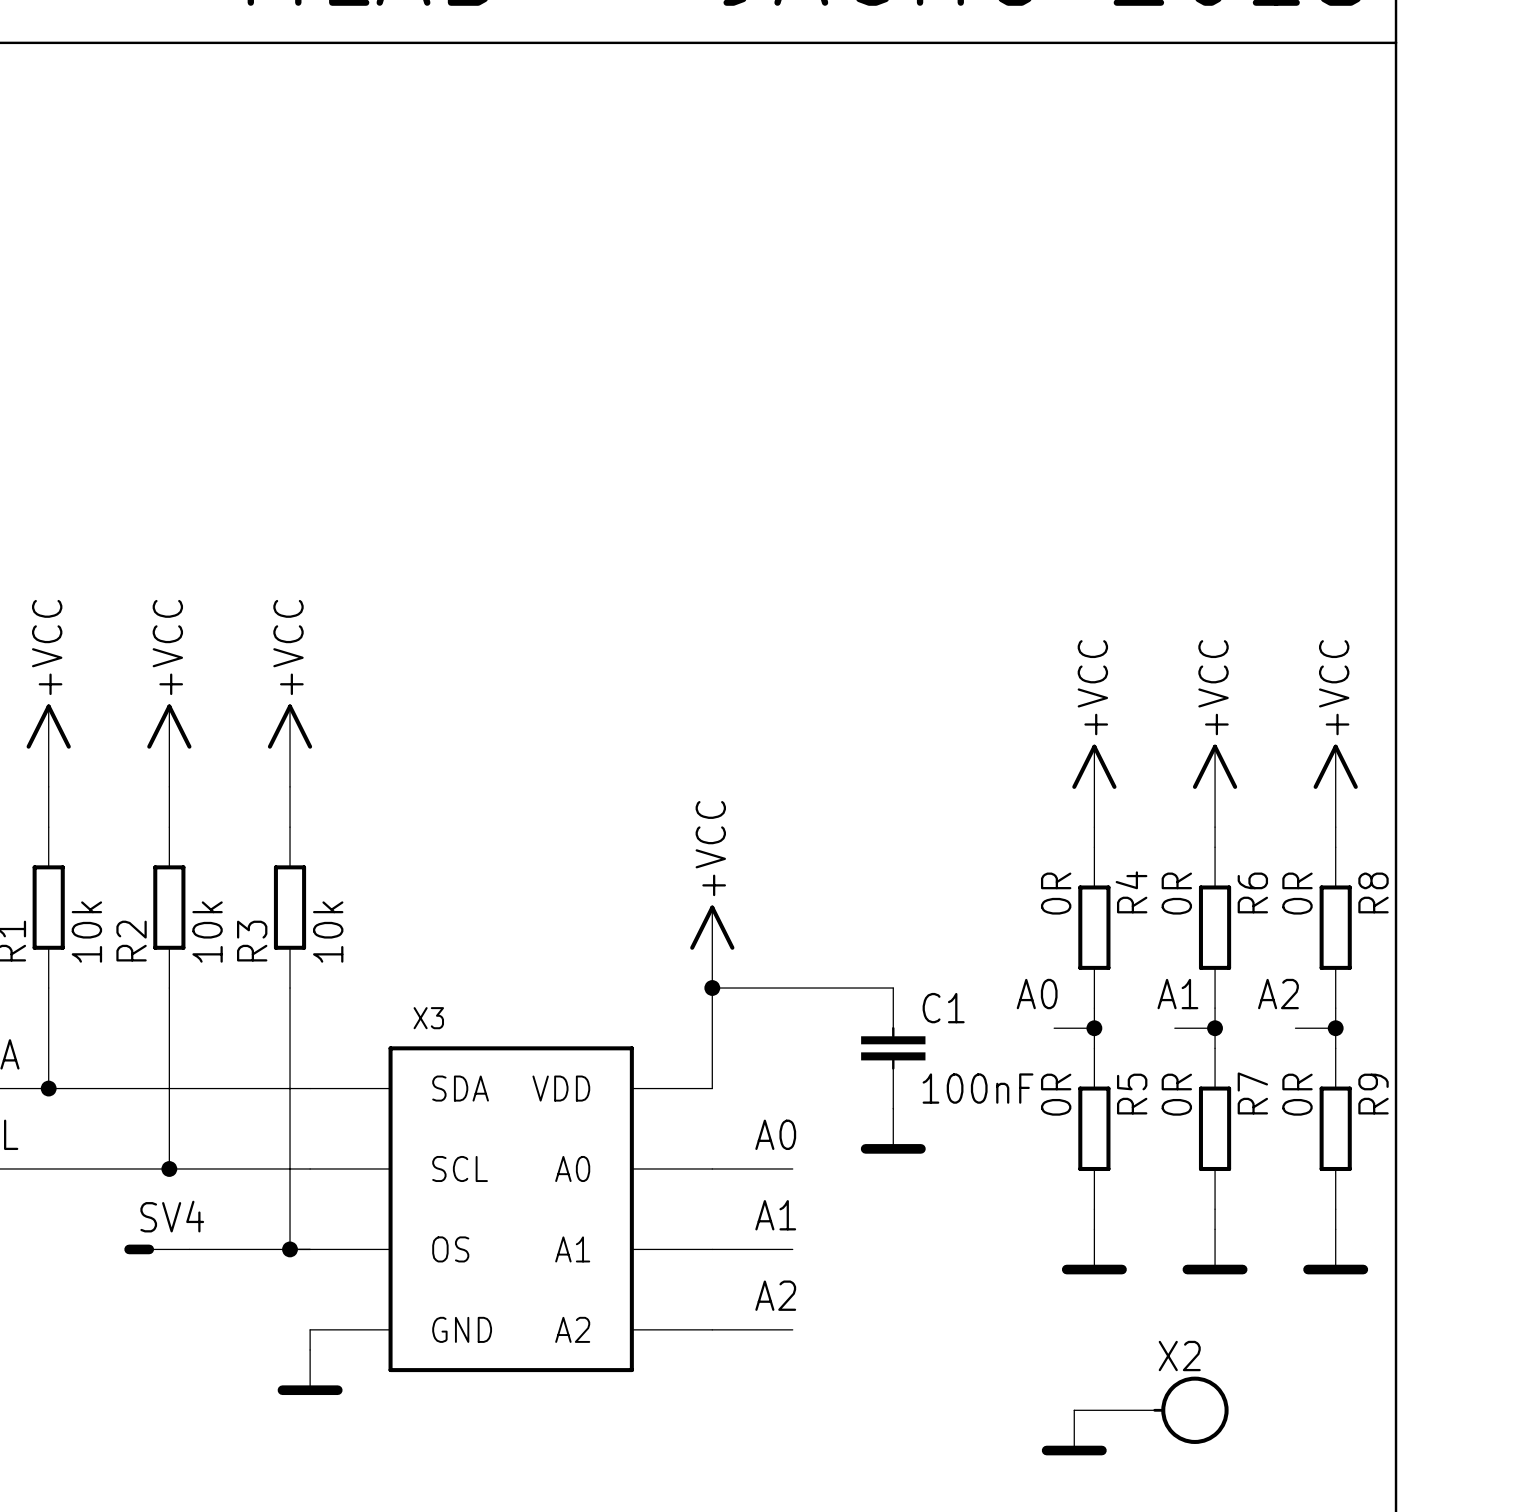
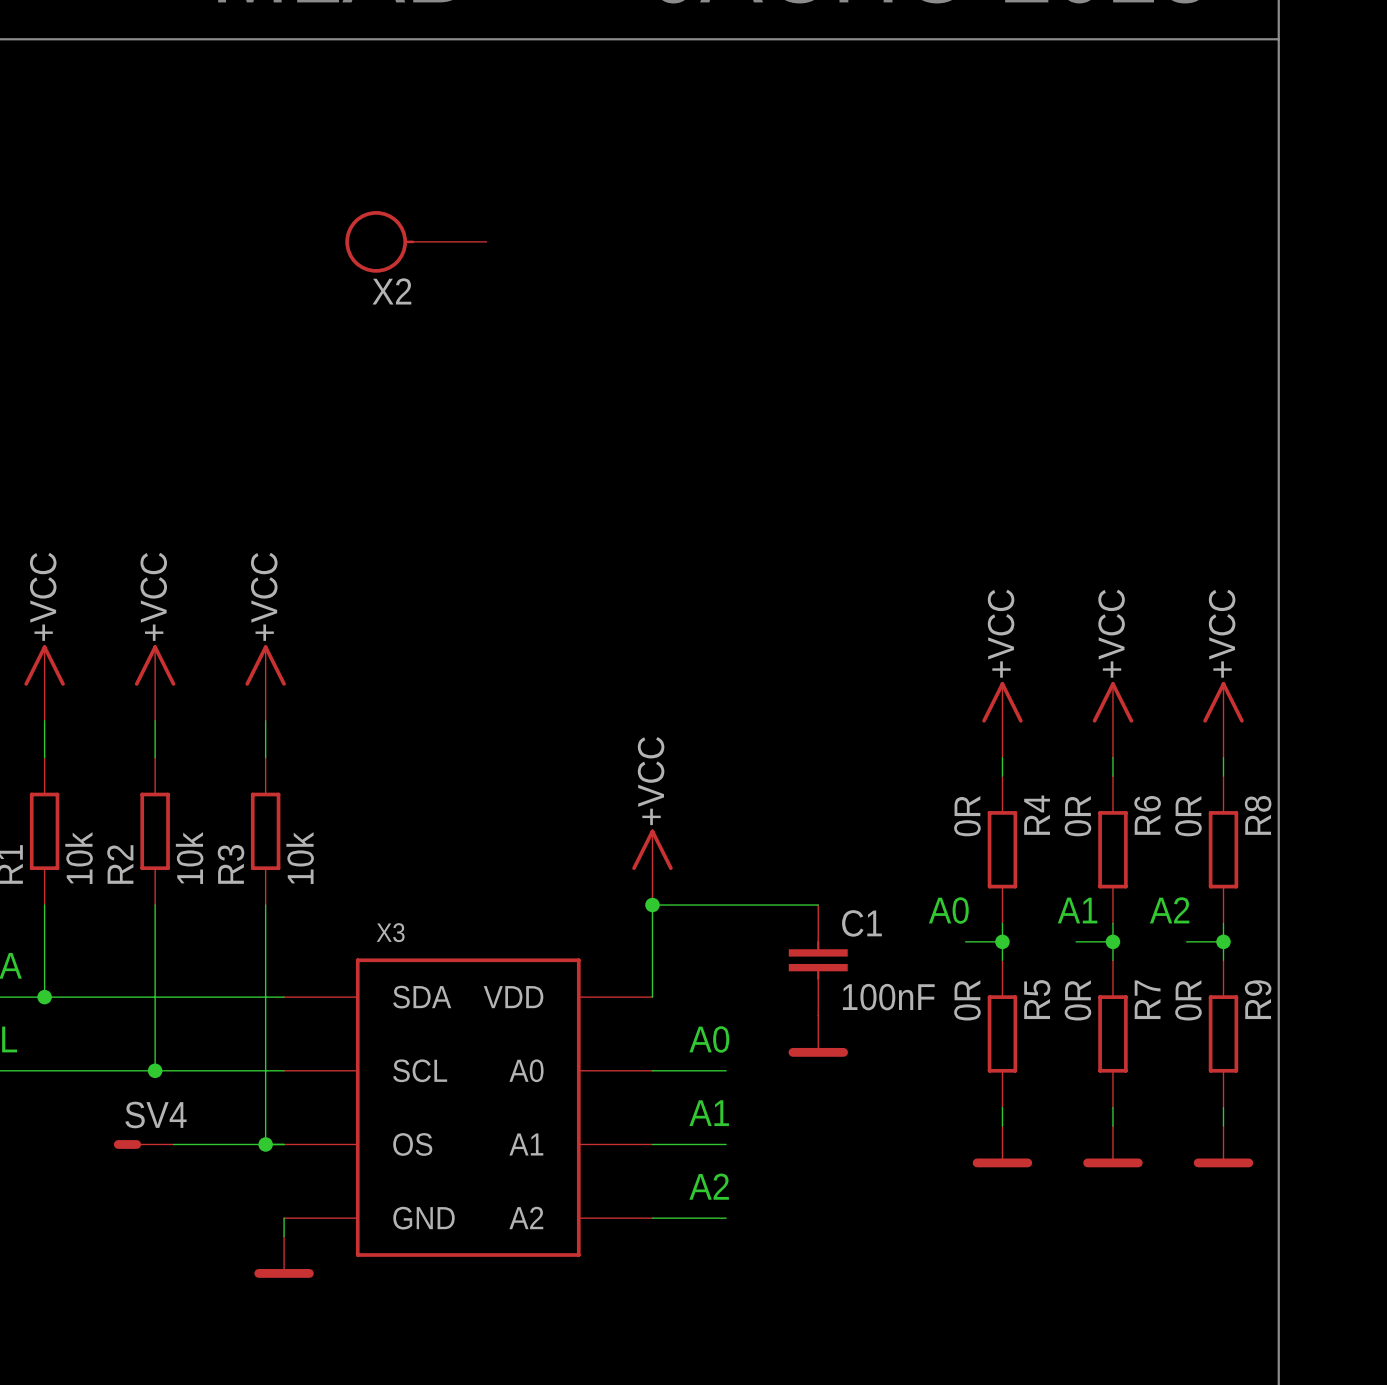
X2 position: (1151, 1410) -> (416, 241)
X2 rotation: 0° (1190, 1410) -> 180° (379, 241)
power symbol: (1074, 1432) -> none

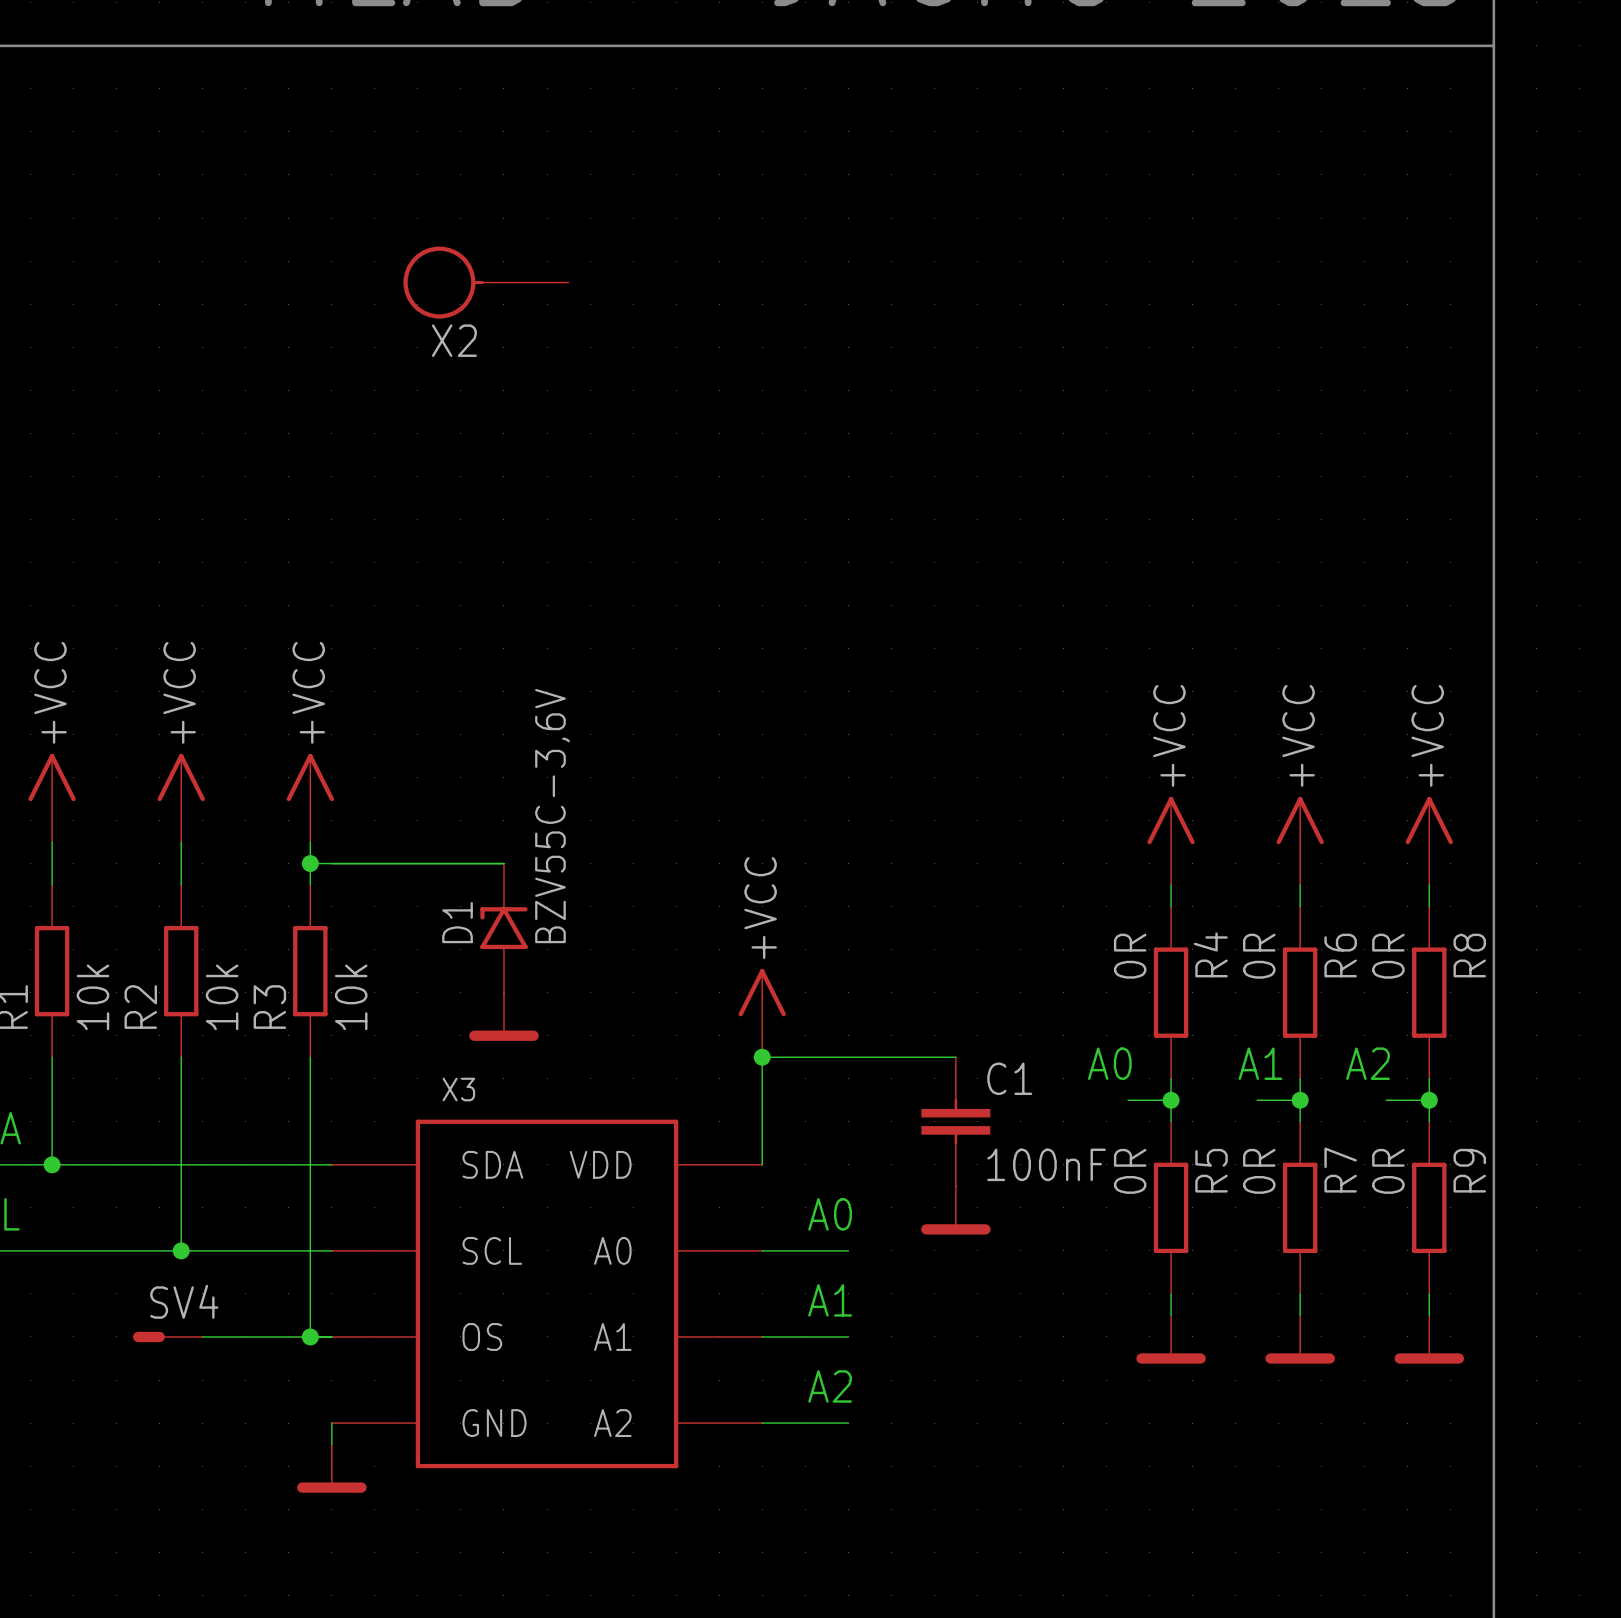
wire: none -> (310, 863) (503, 863)
junction: none -> (310, 863)
D1: none -> BZV55C-3,6V (503, 928)
power symbol: none -> (503, 1016)

